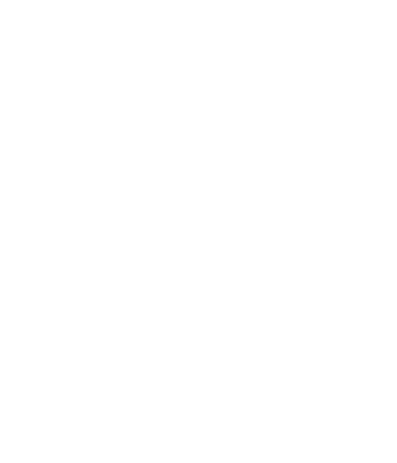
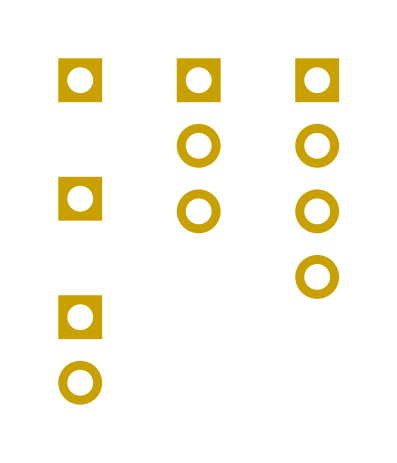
part: none -> (80, 80)
part: none -> (198, 145)
part: none -> (317, 178)
part: none -> (80, 198)
part: none -> (80, 349)

